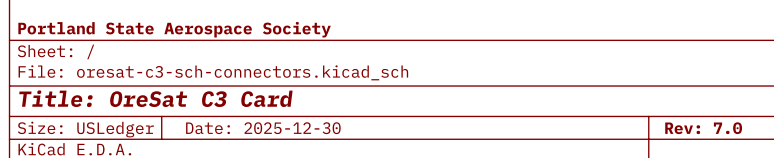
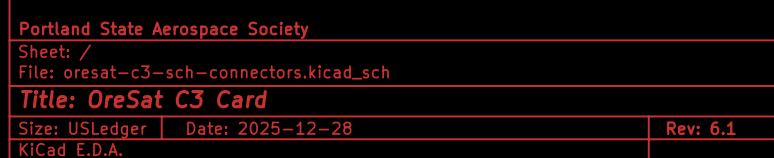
title block: Date: 2025-12-30 (263, 128) -> Date: 2025-12-28 (269, 128)
title block: Rev: 7.0 (703, 128) -> Rev: 6.1 (701, 128)

